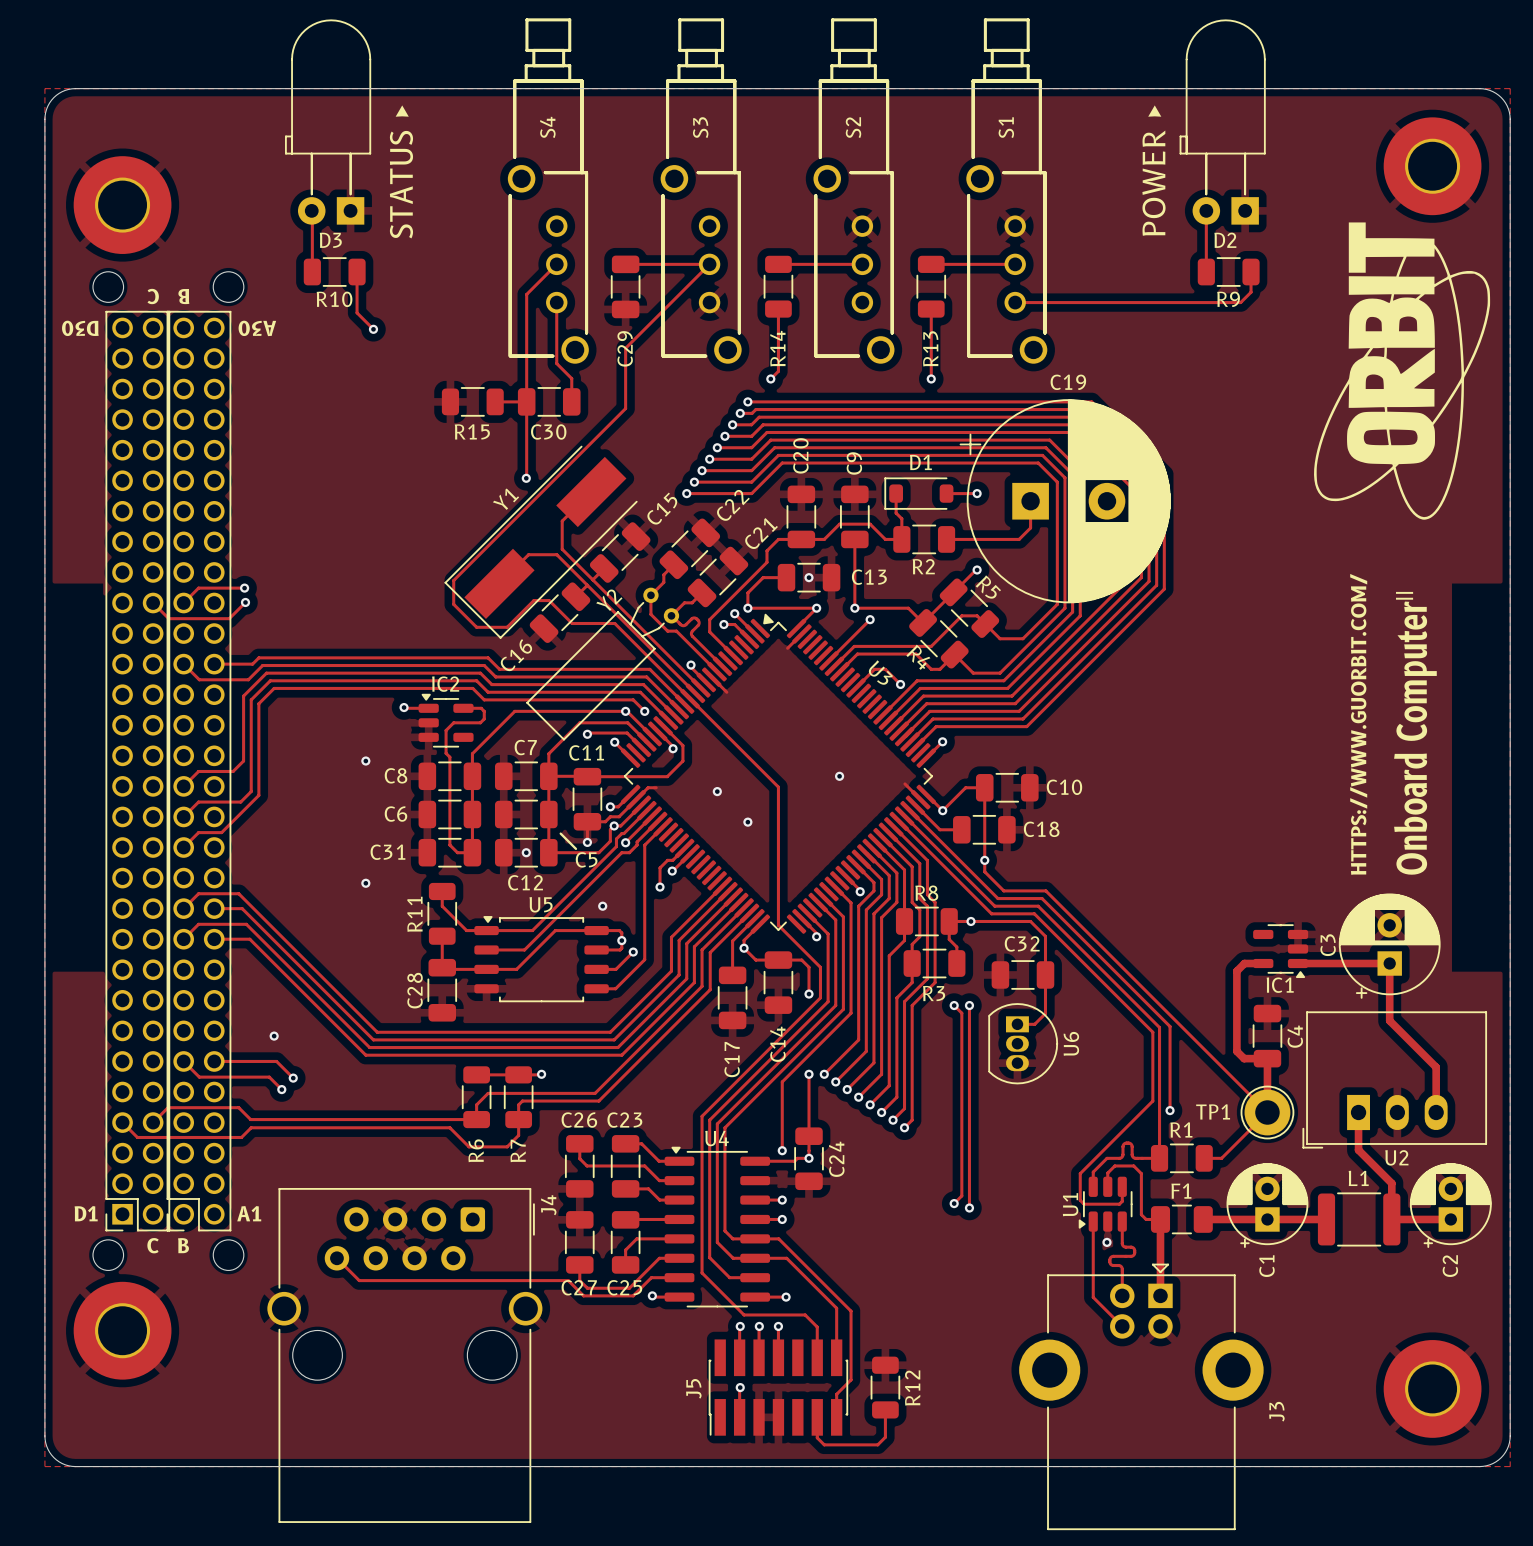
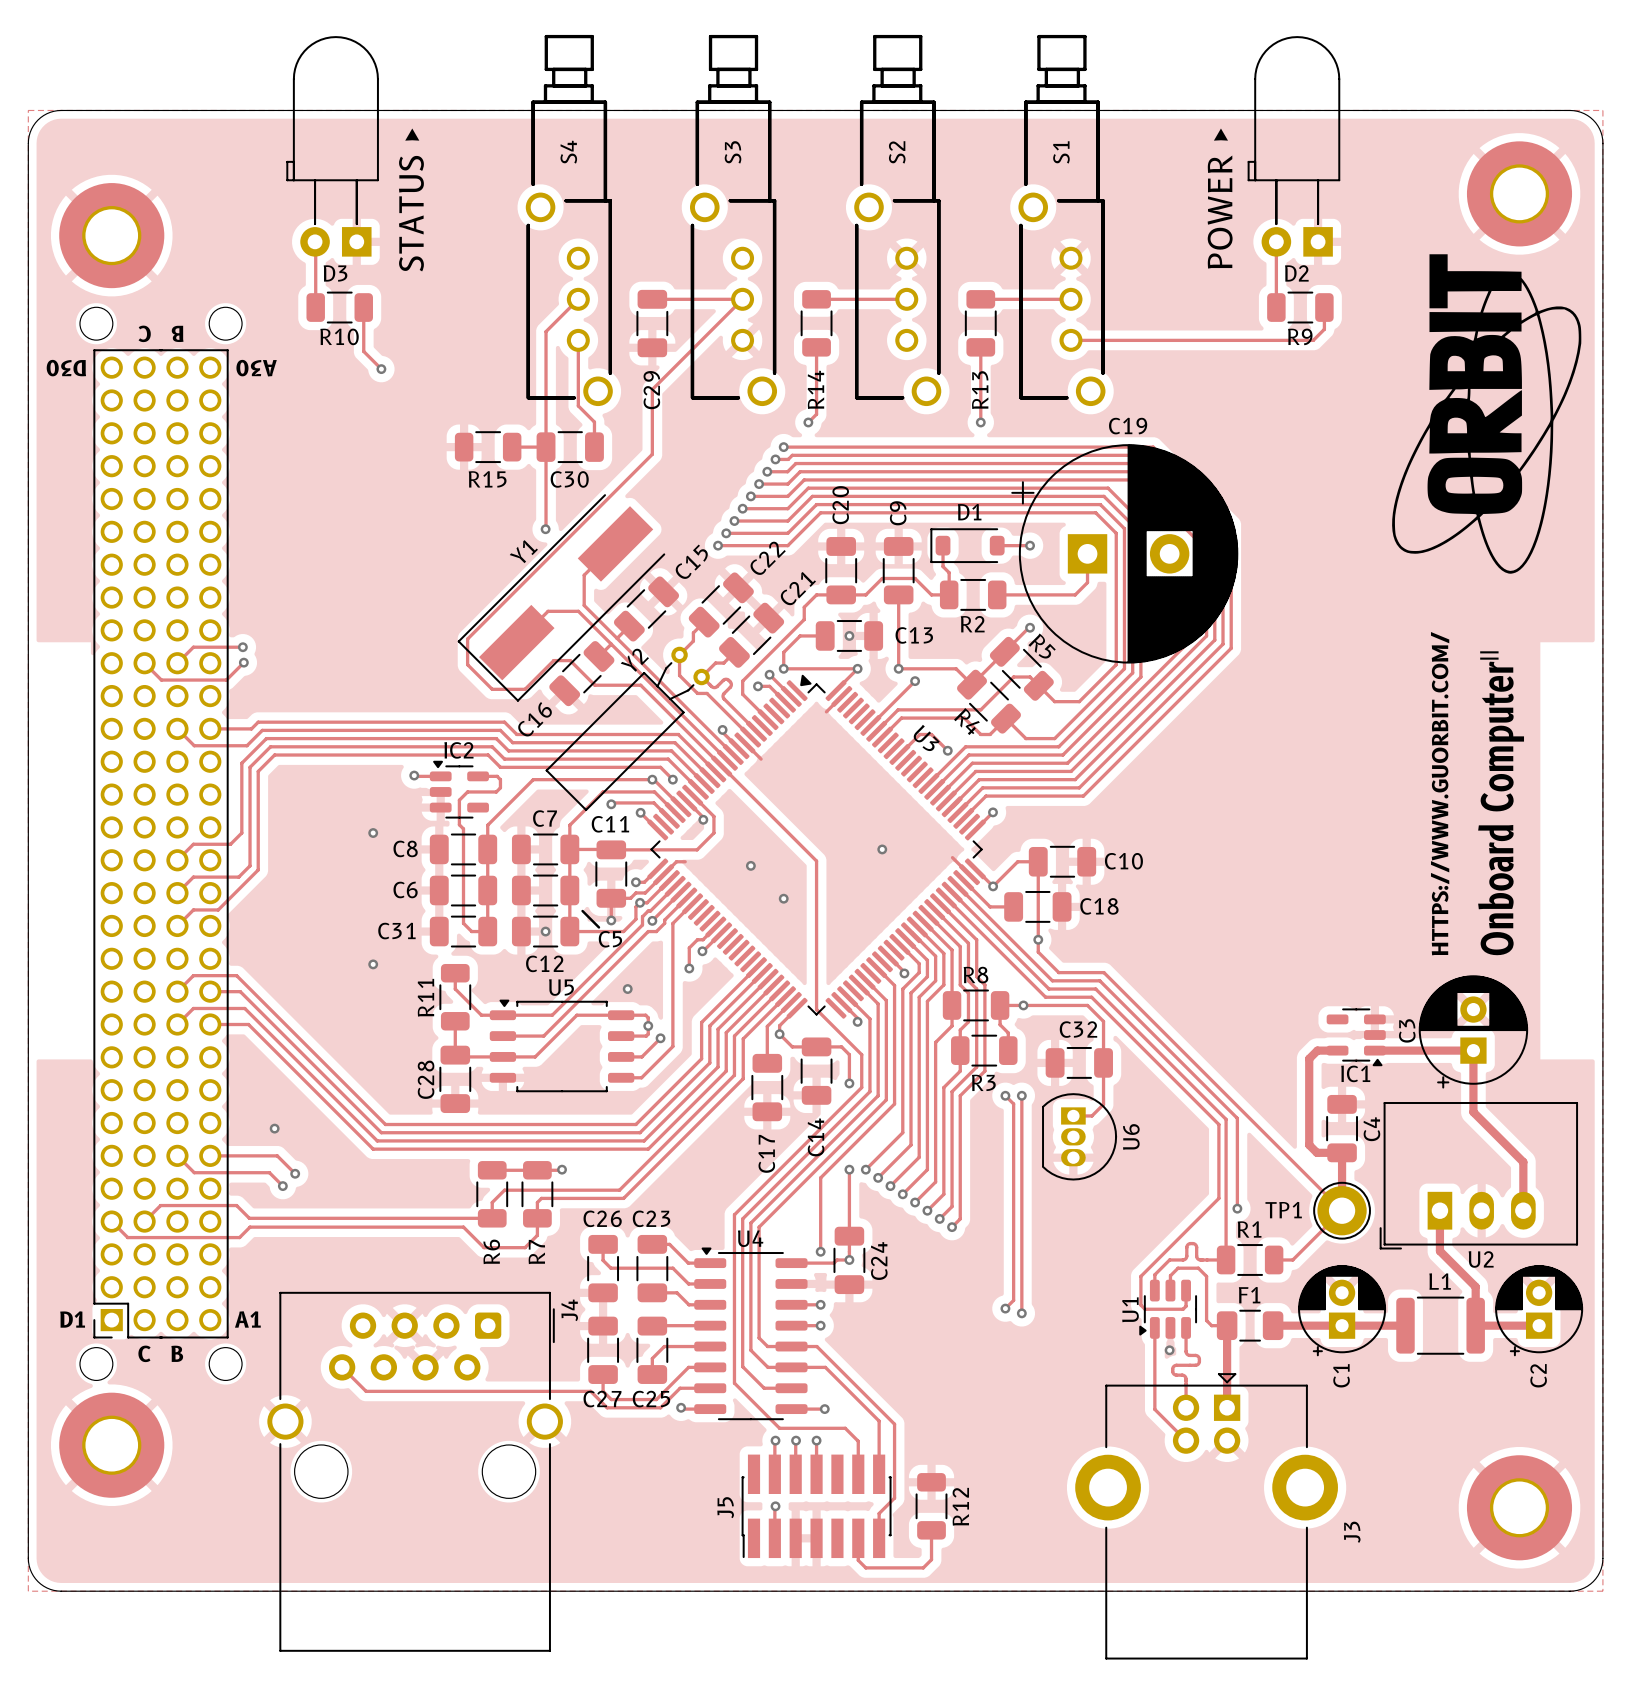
part footprint: [105, 310, 171, 1232] -> [93, 349, 163, 1339]
part footprint: [166, 310, 232, 1232] -> [159, 349, 229, 1339]

